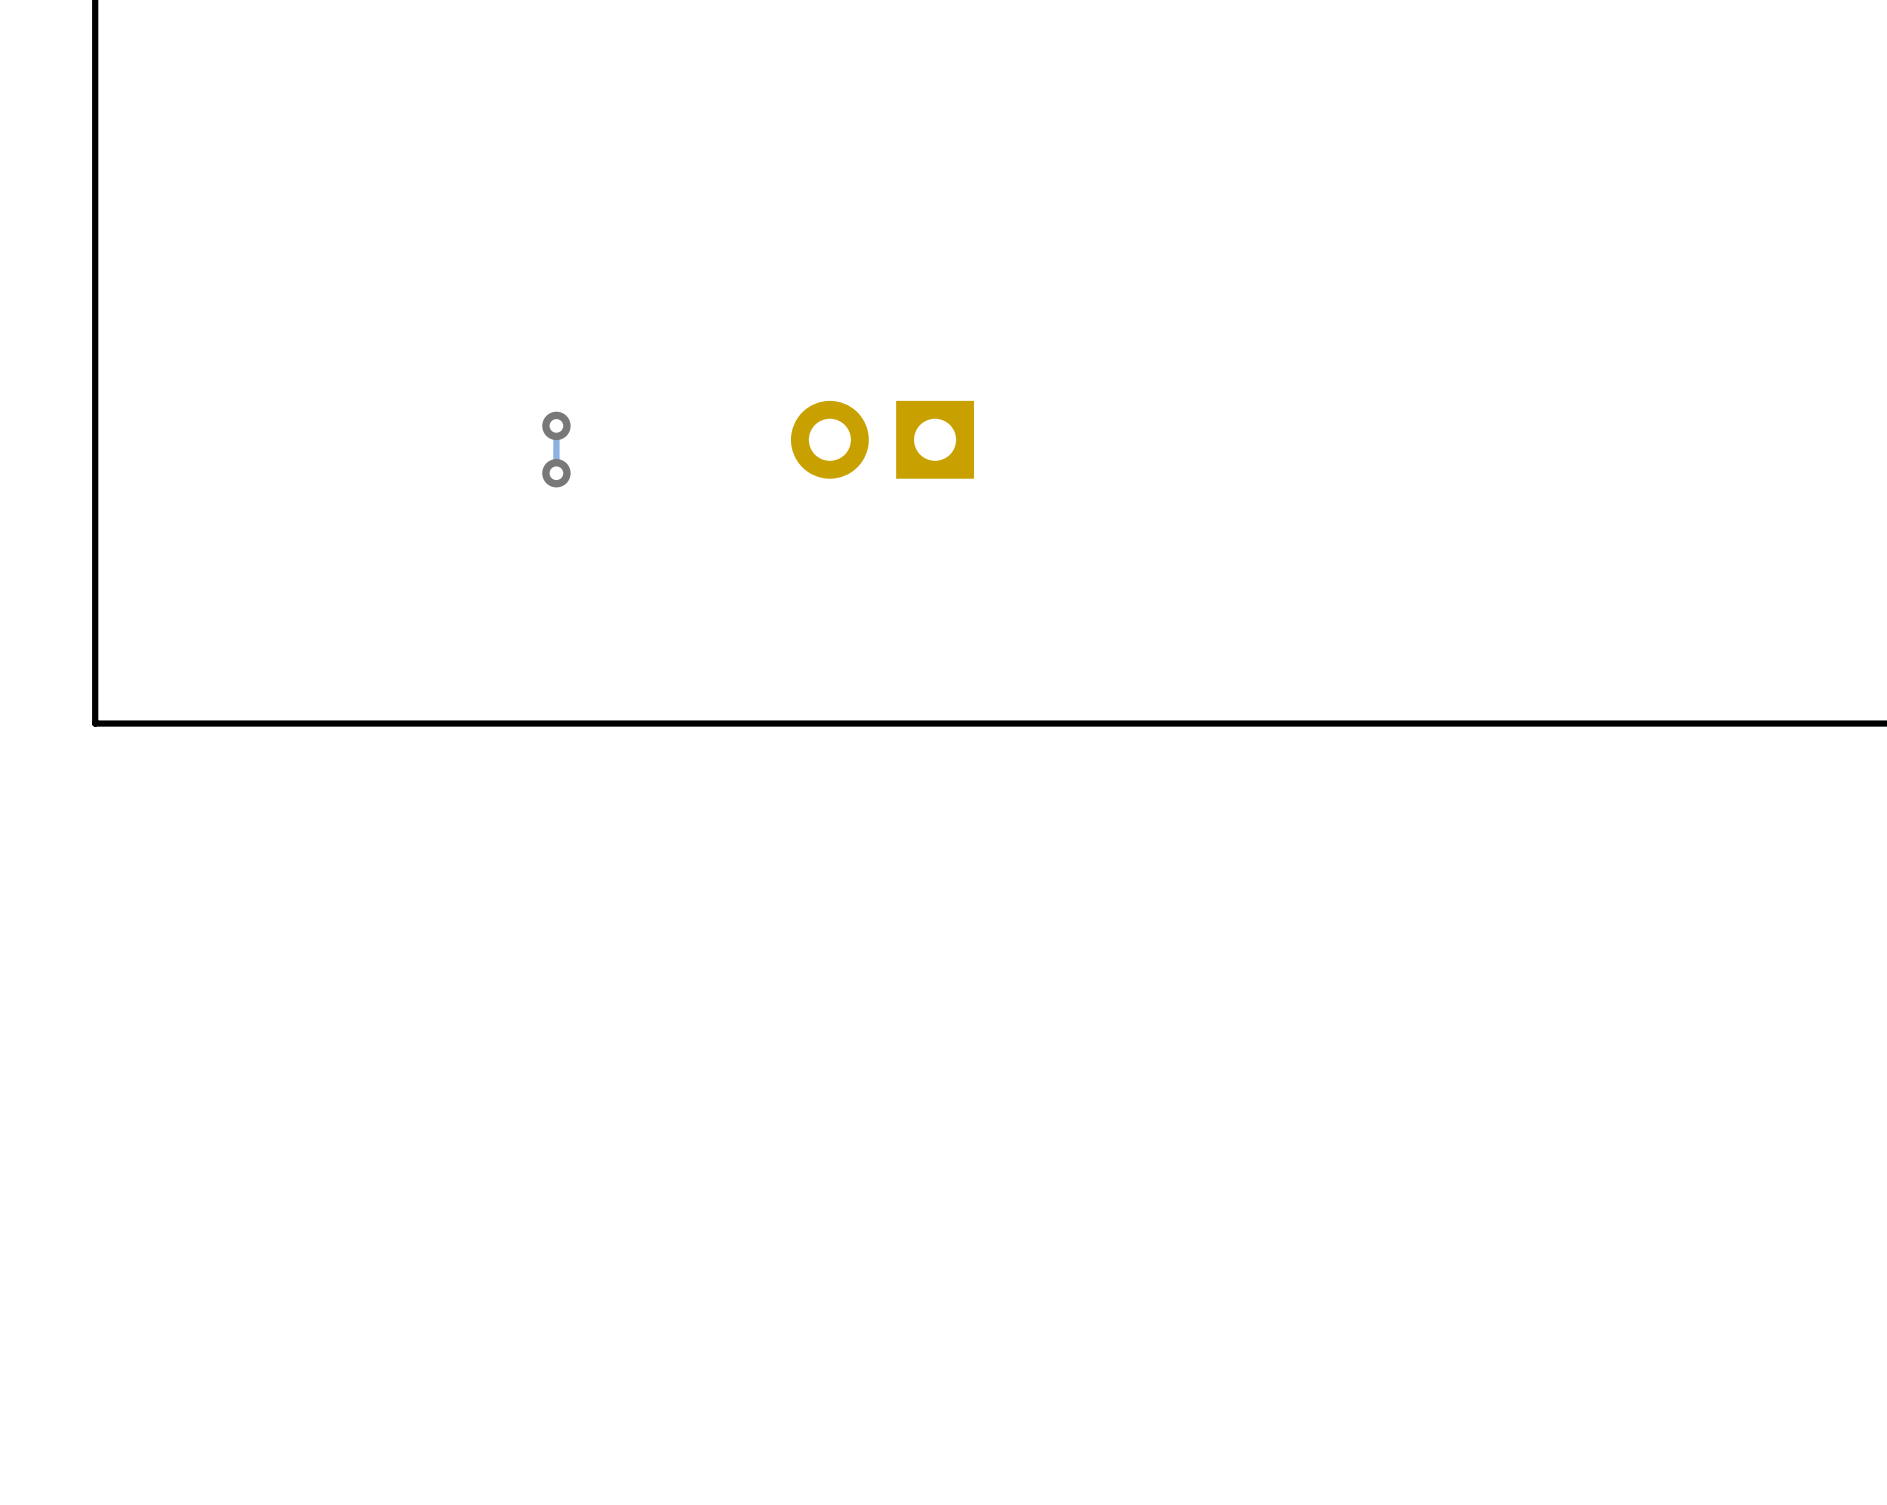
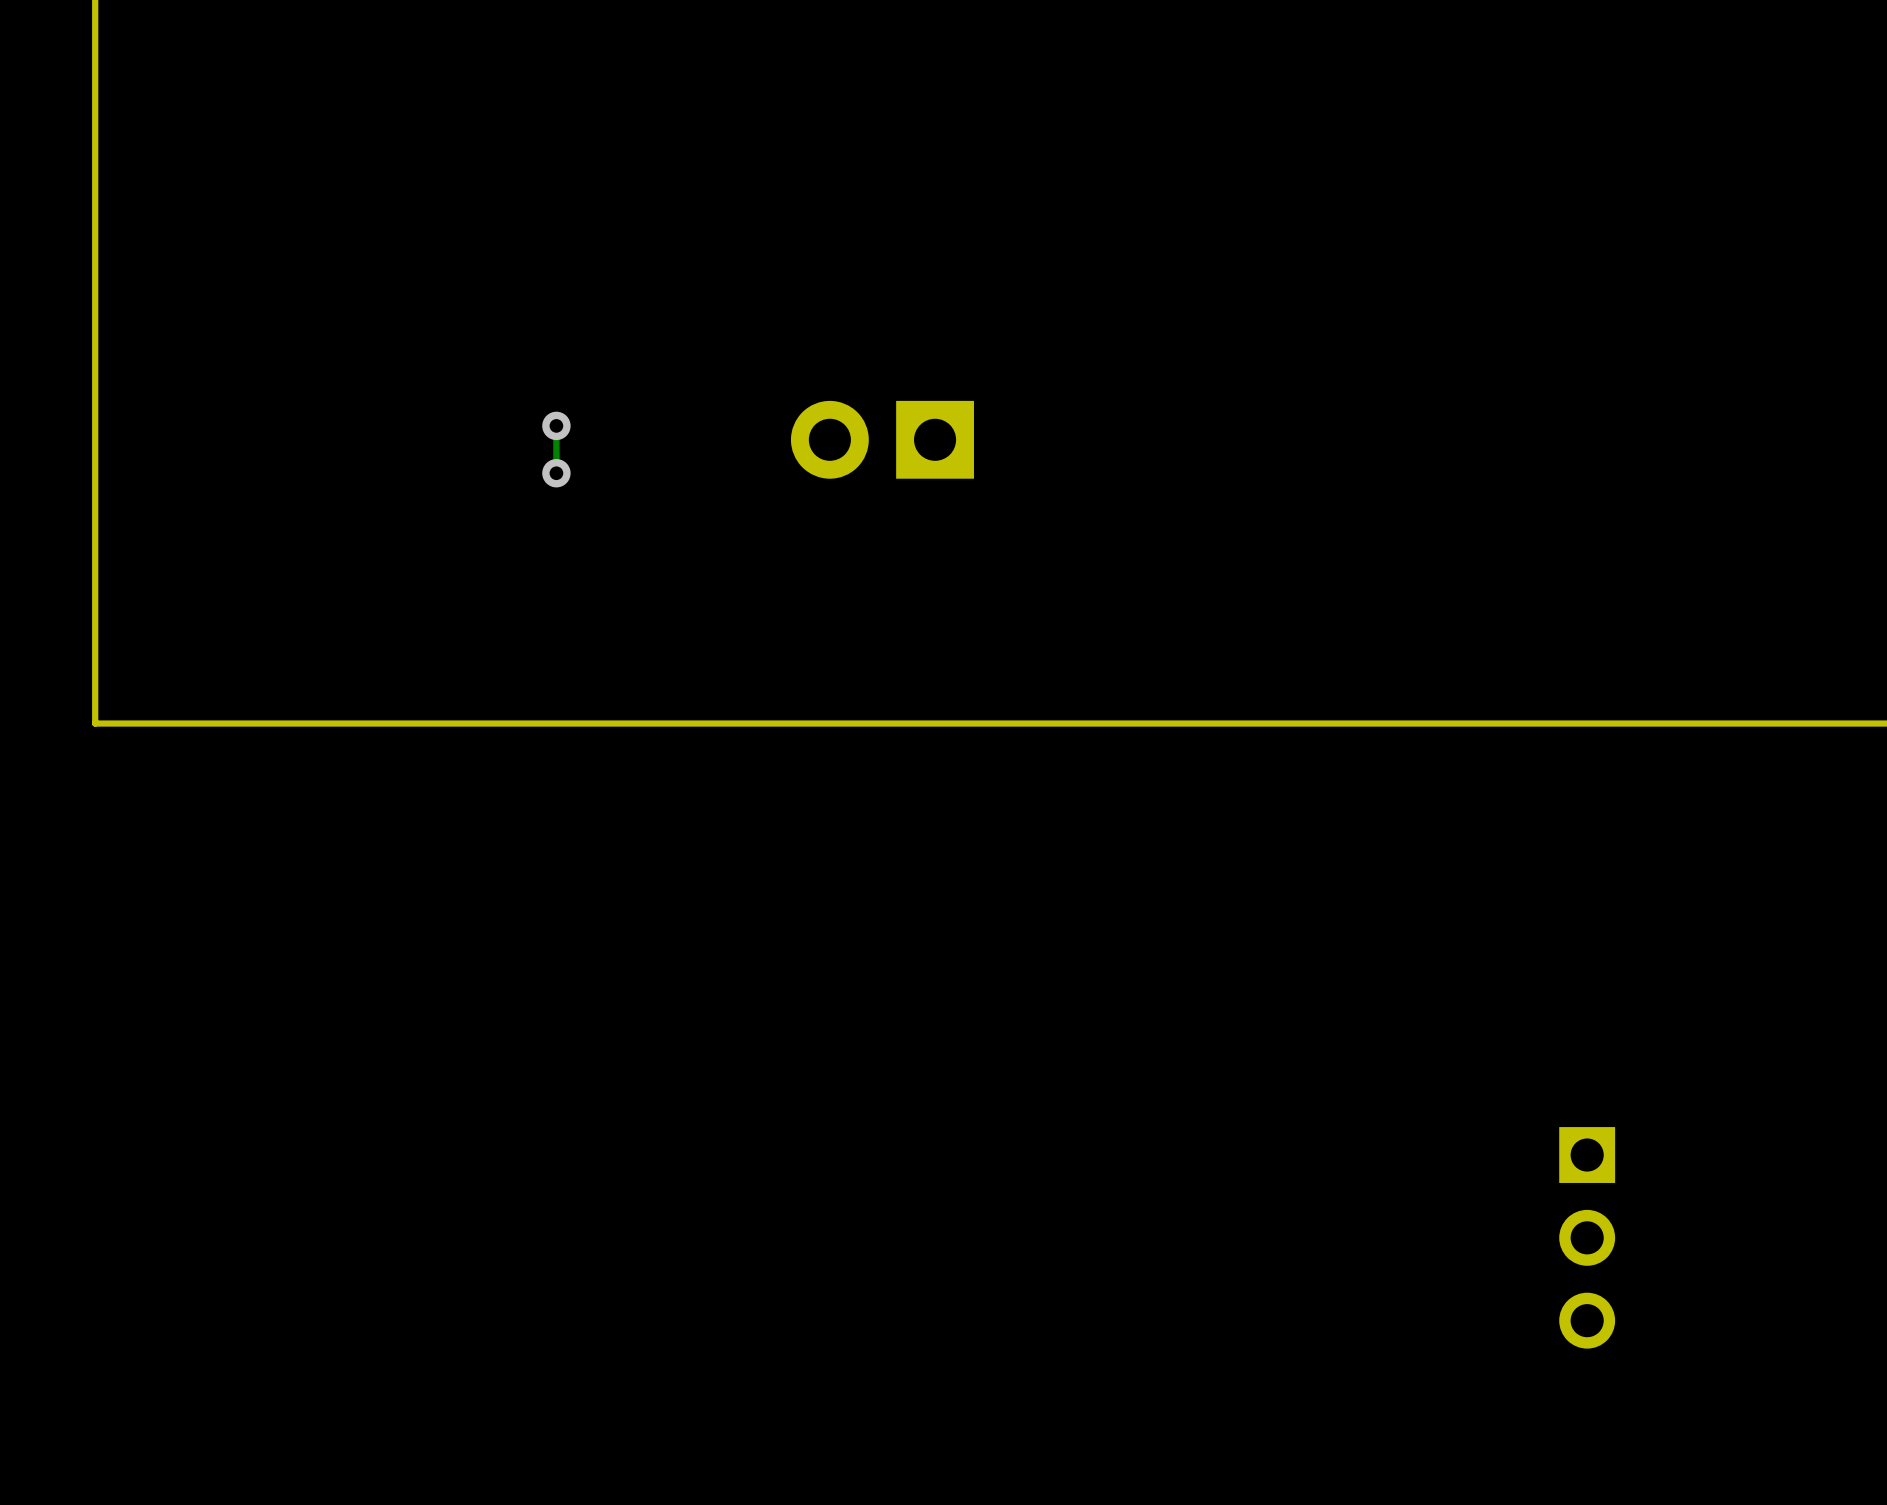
part: none -> (1587, 1237)

